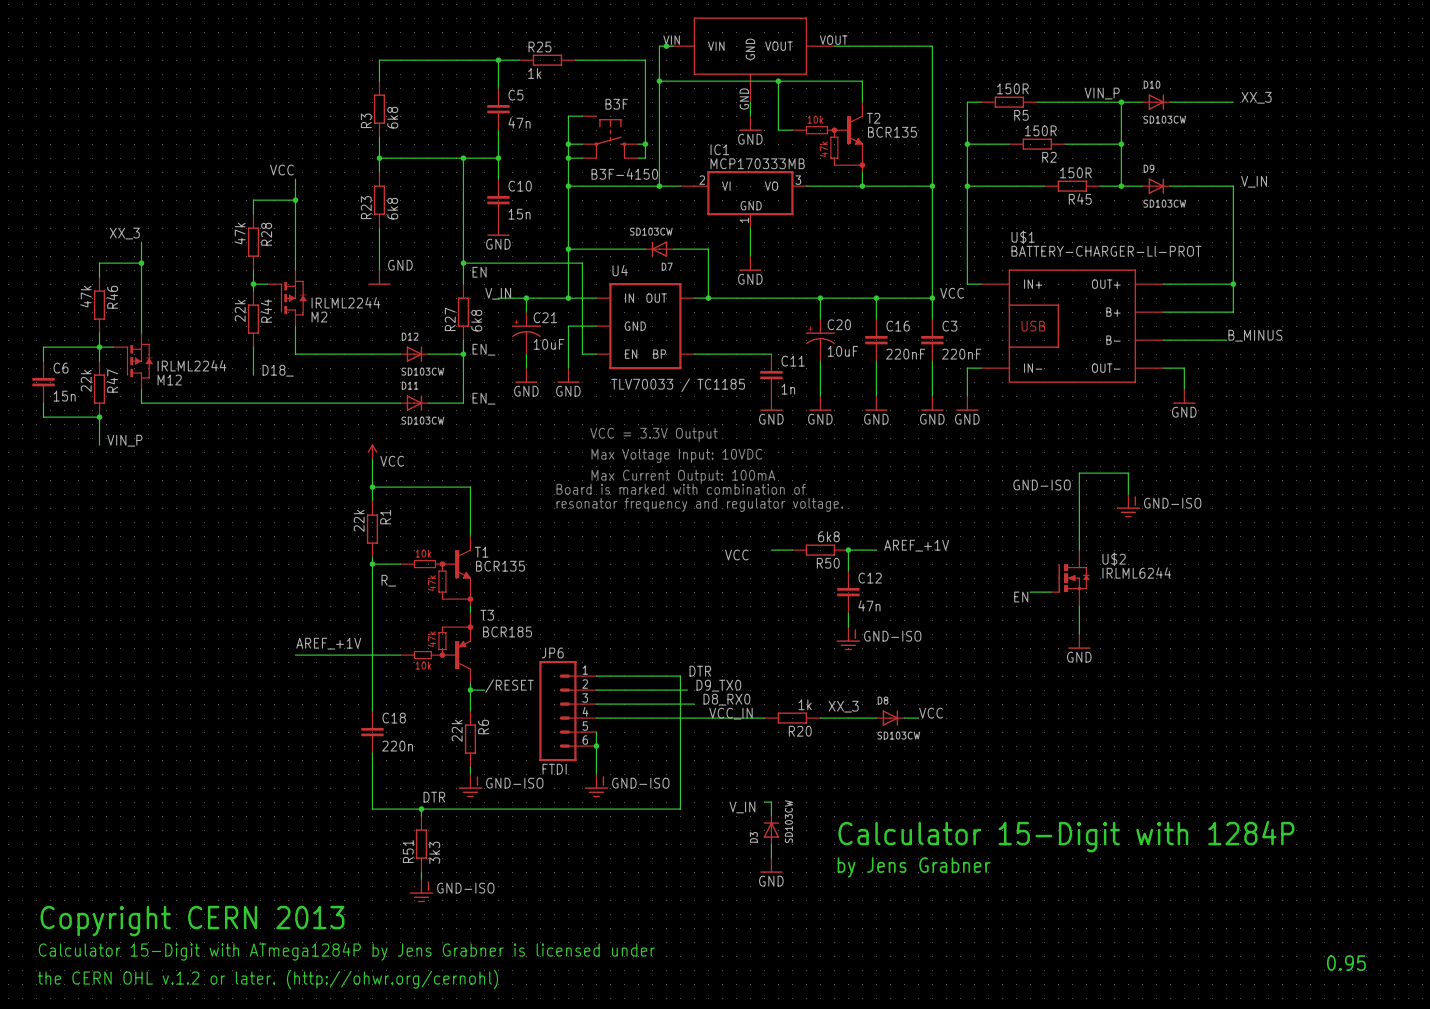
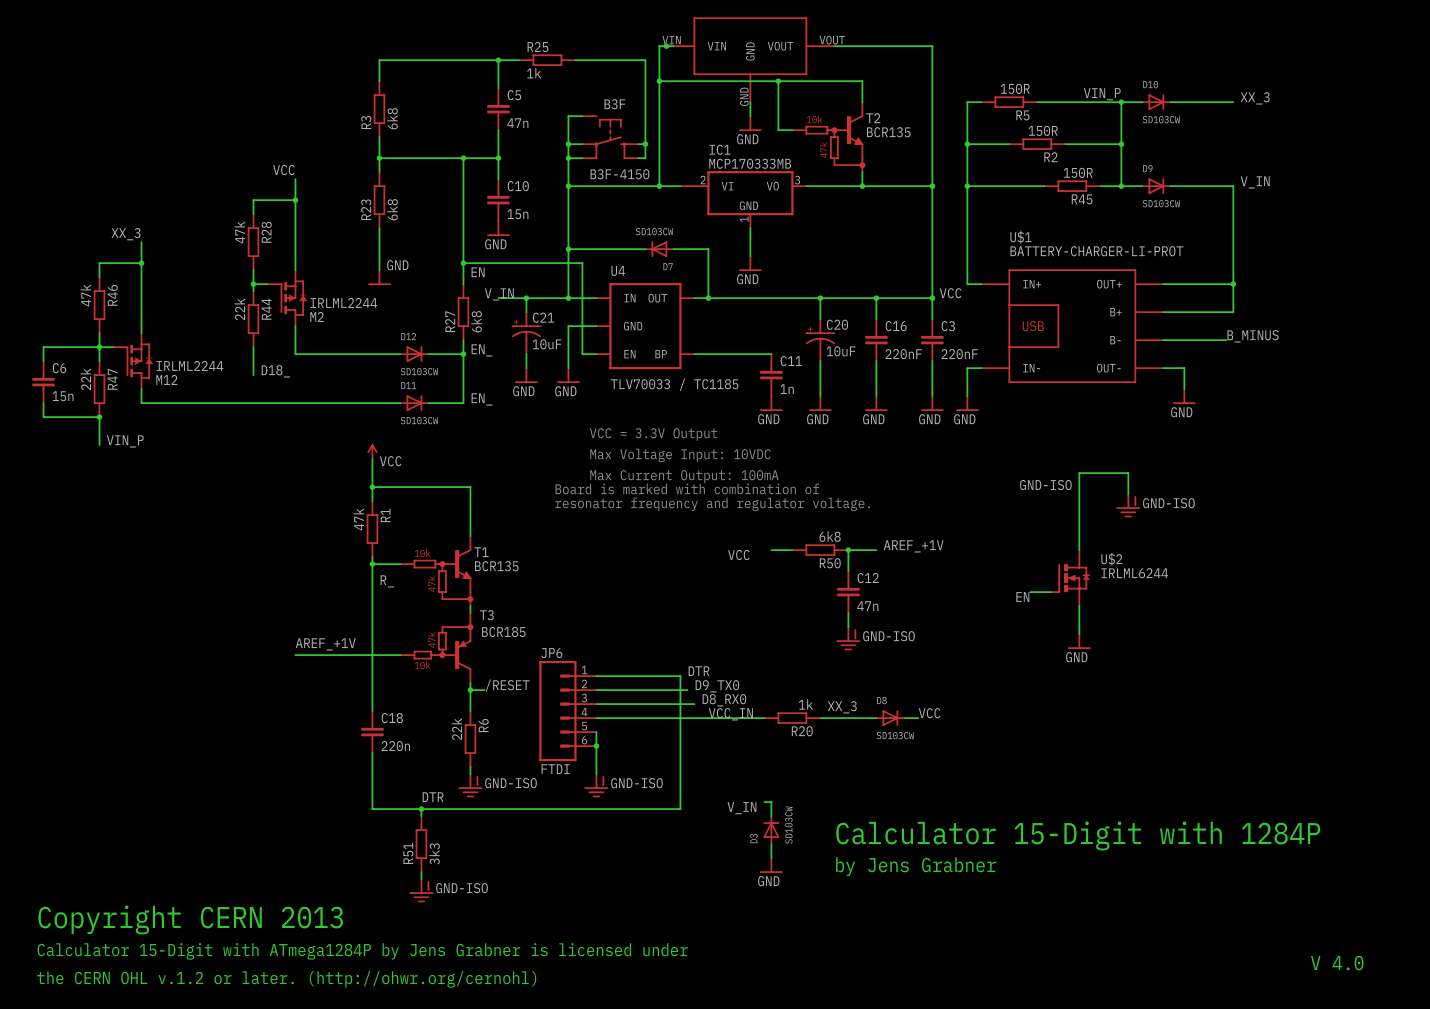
R1 value: 22k (359, 520) -> 47k (358, 519)
text: none -> V 4.0 (1337, 963)
text: 0.95 (1346, 963) -> none

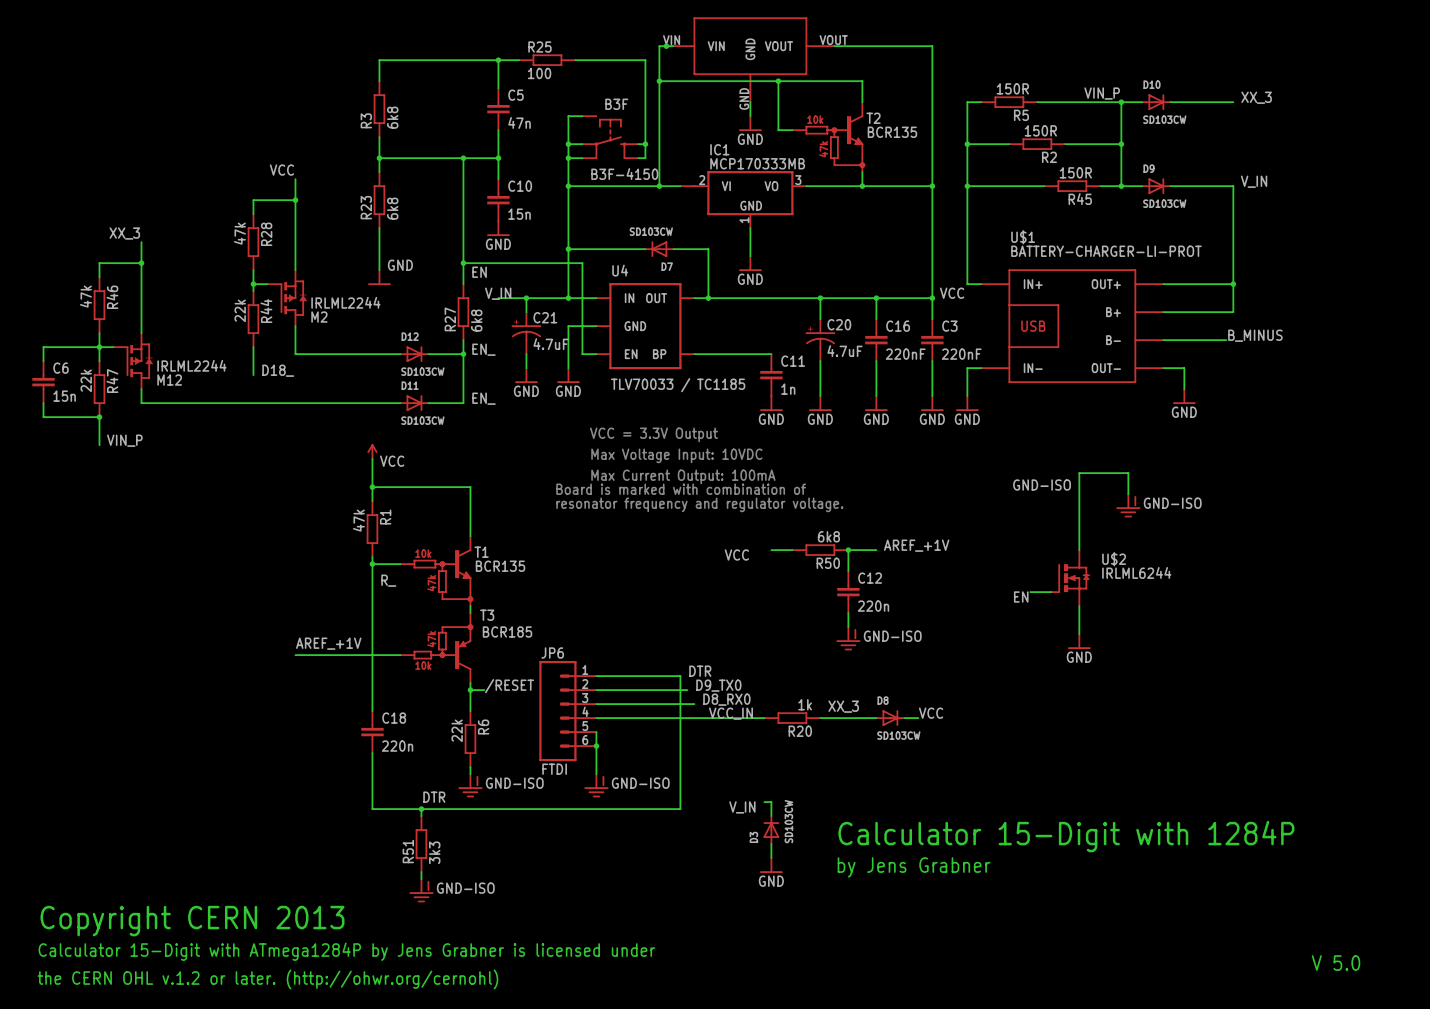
R25 value: 1k (534, 73) -> 100 (539, 73)
C21 value: 10uF (547, 344) -> 4.7uF (551, 344)
C20 value: 10uF (841, 351) -> 4.7uF (844, 351)
C12 value: 47n (867, 606) -> 220n (873, 606)
text: V 4.0 (1337, 963) -> V 5.0 (1336, 963)

